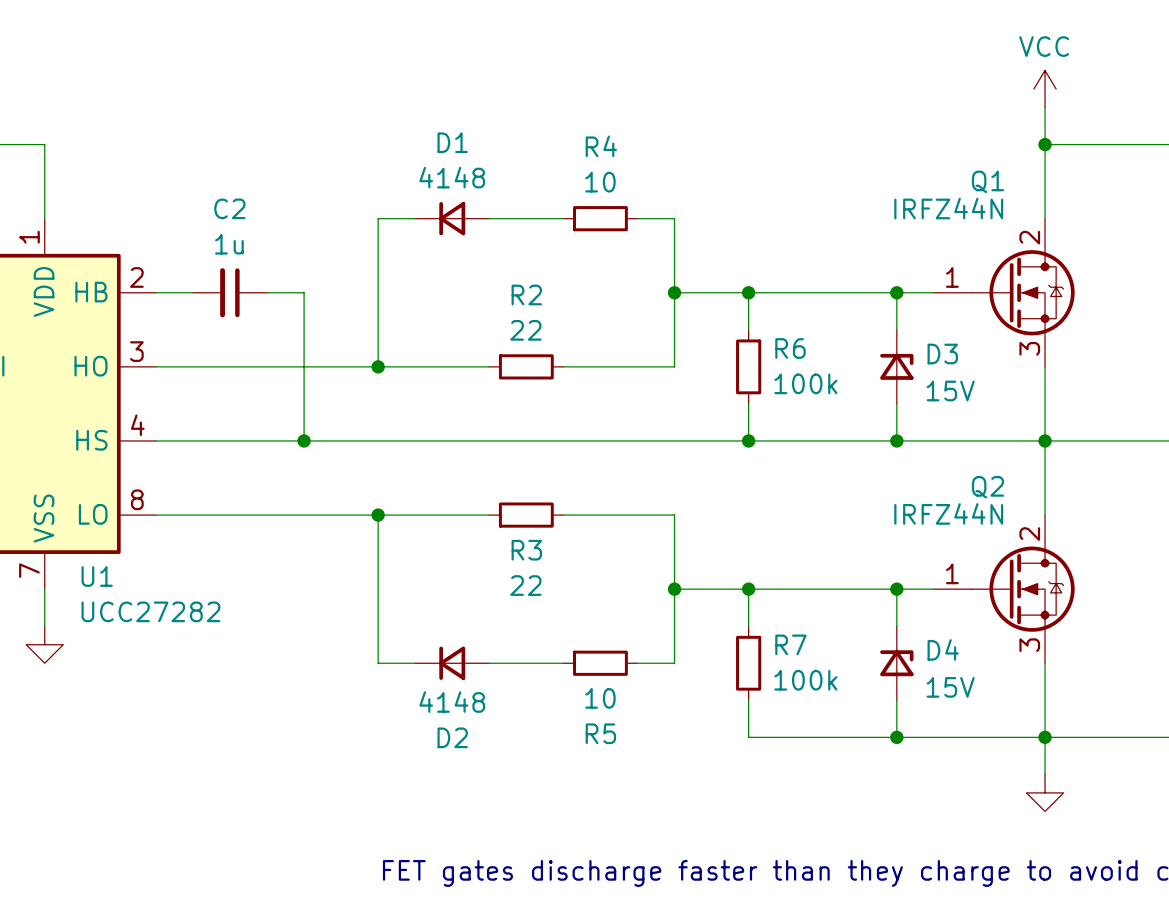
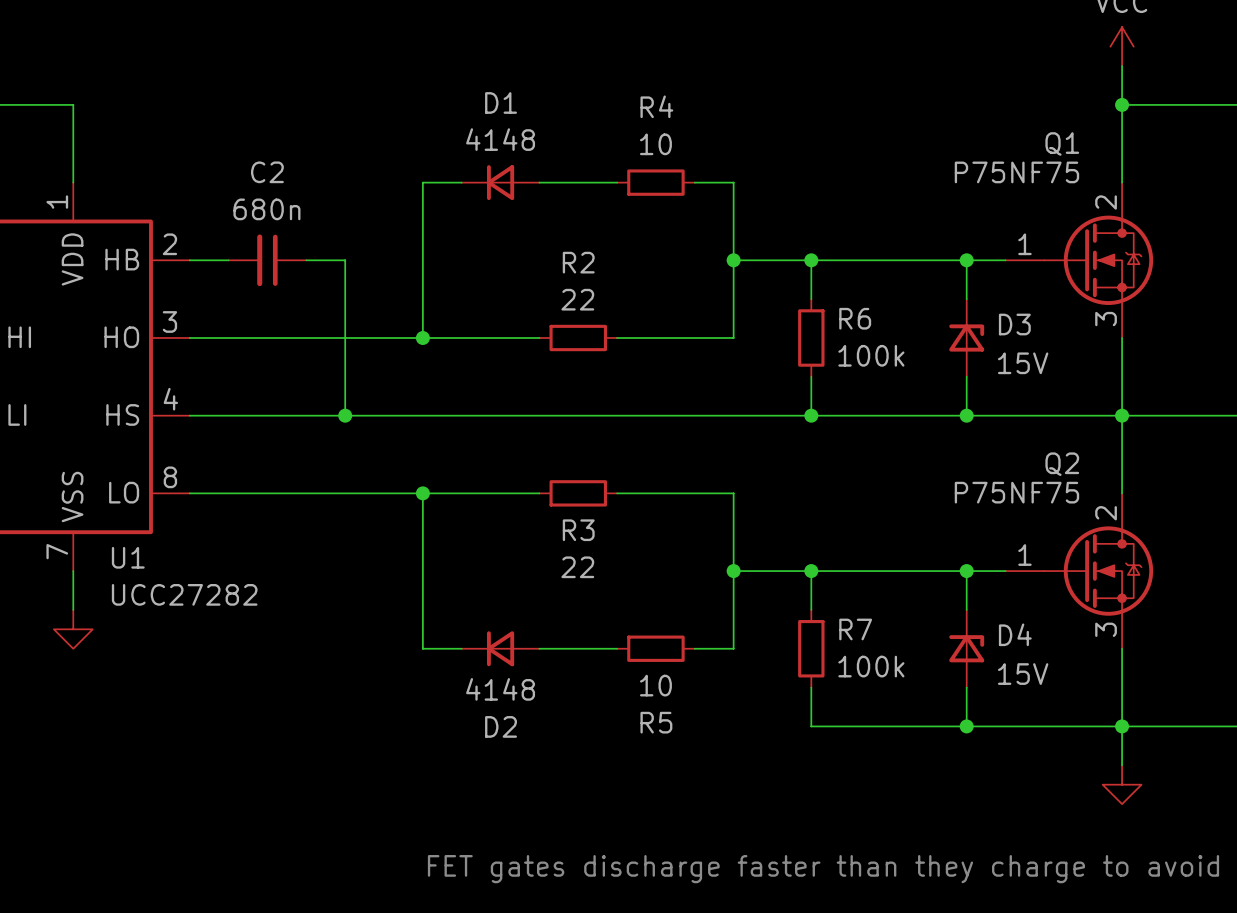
Q1 value: IRFZ44N (948, 208) -> P75NF75 (1016, 172)
C2 value: 1u (229, 244) -> 680n (266, 209)
Q2 value: IRFZ44N (948, 513) -> P75NF75 (1016, 492)

